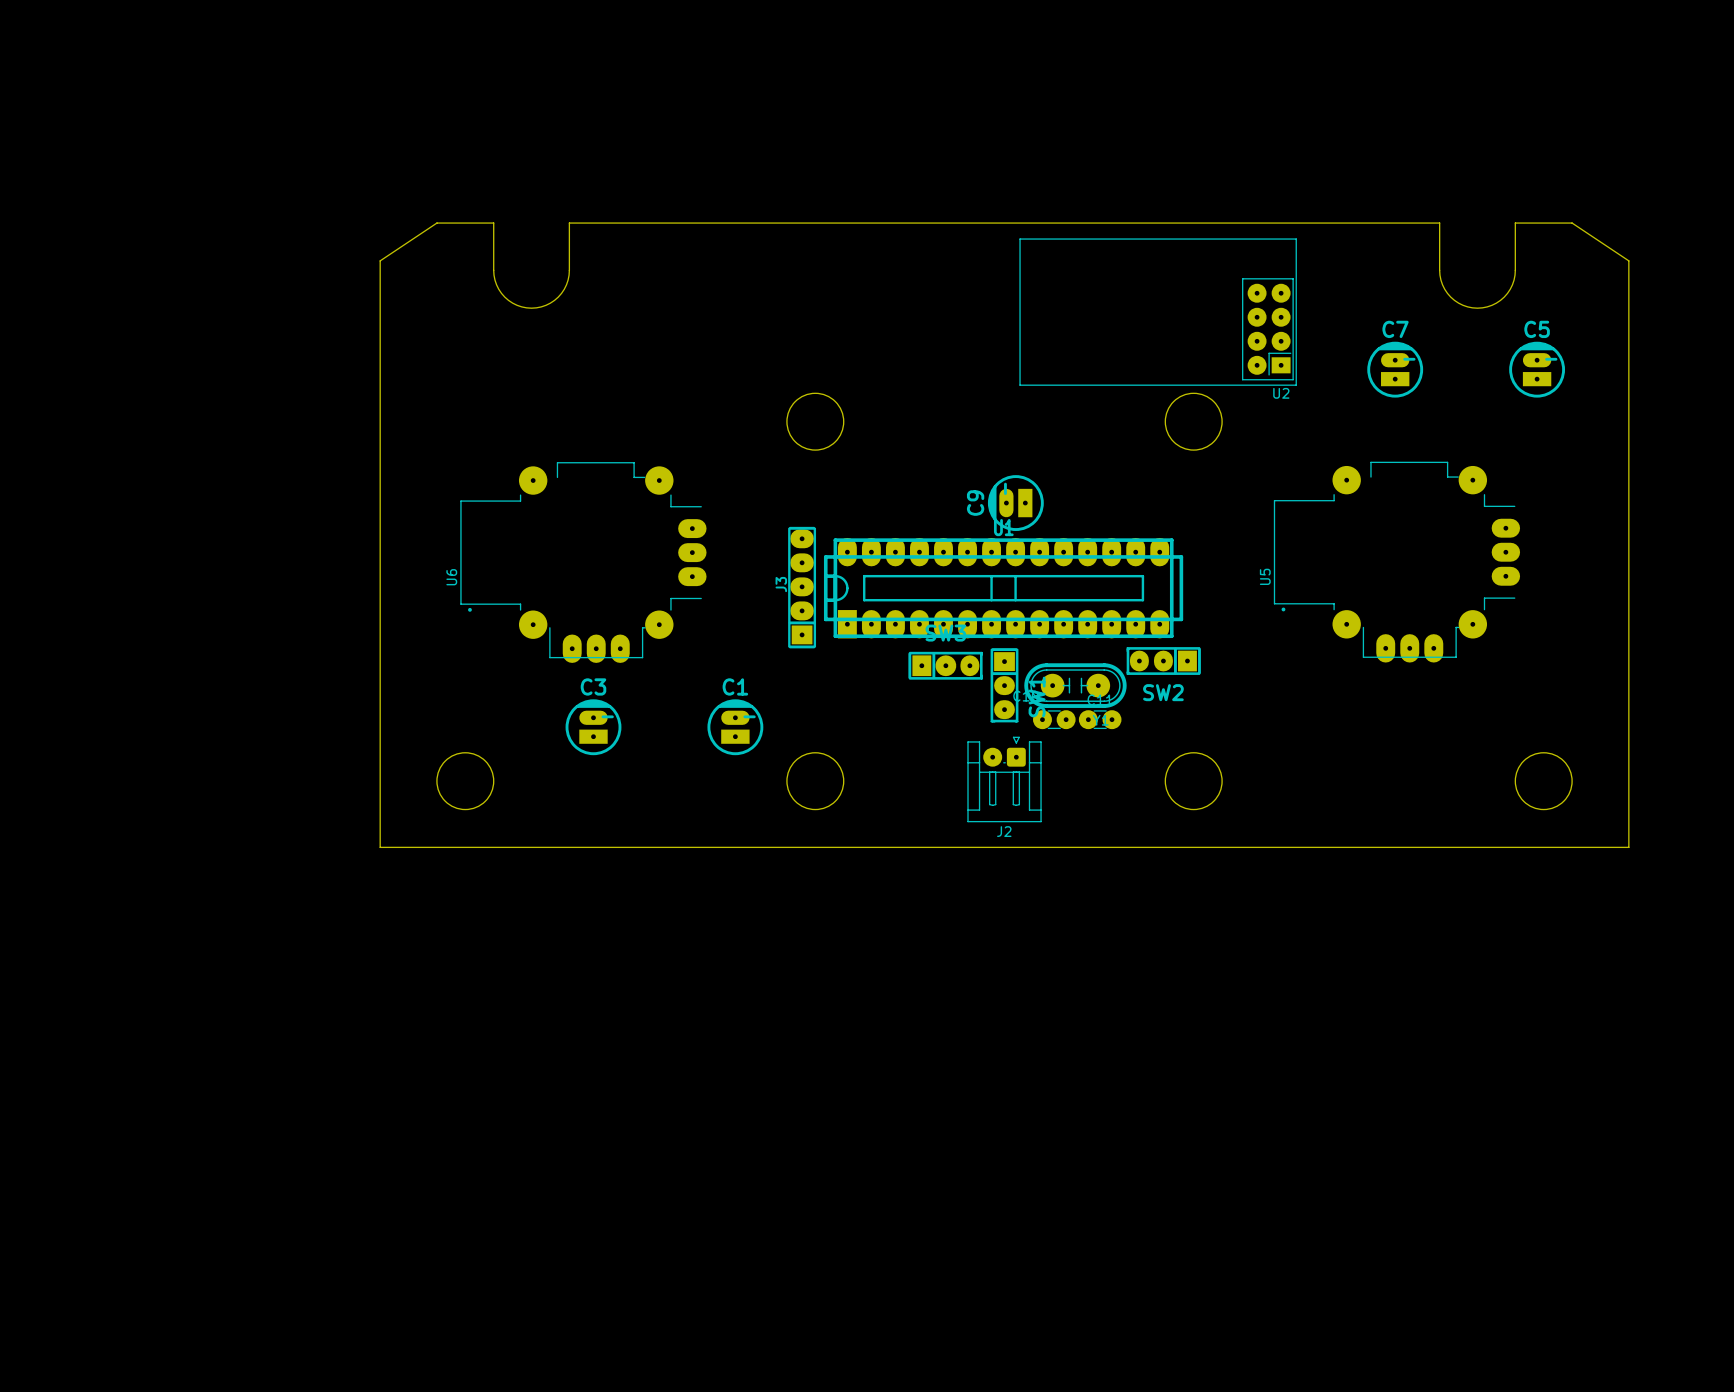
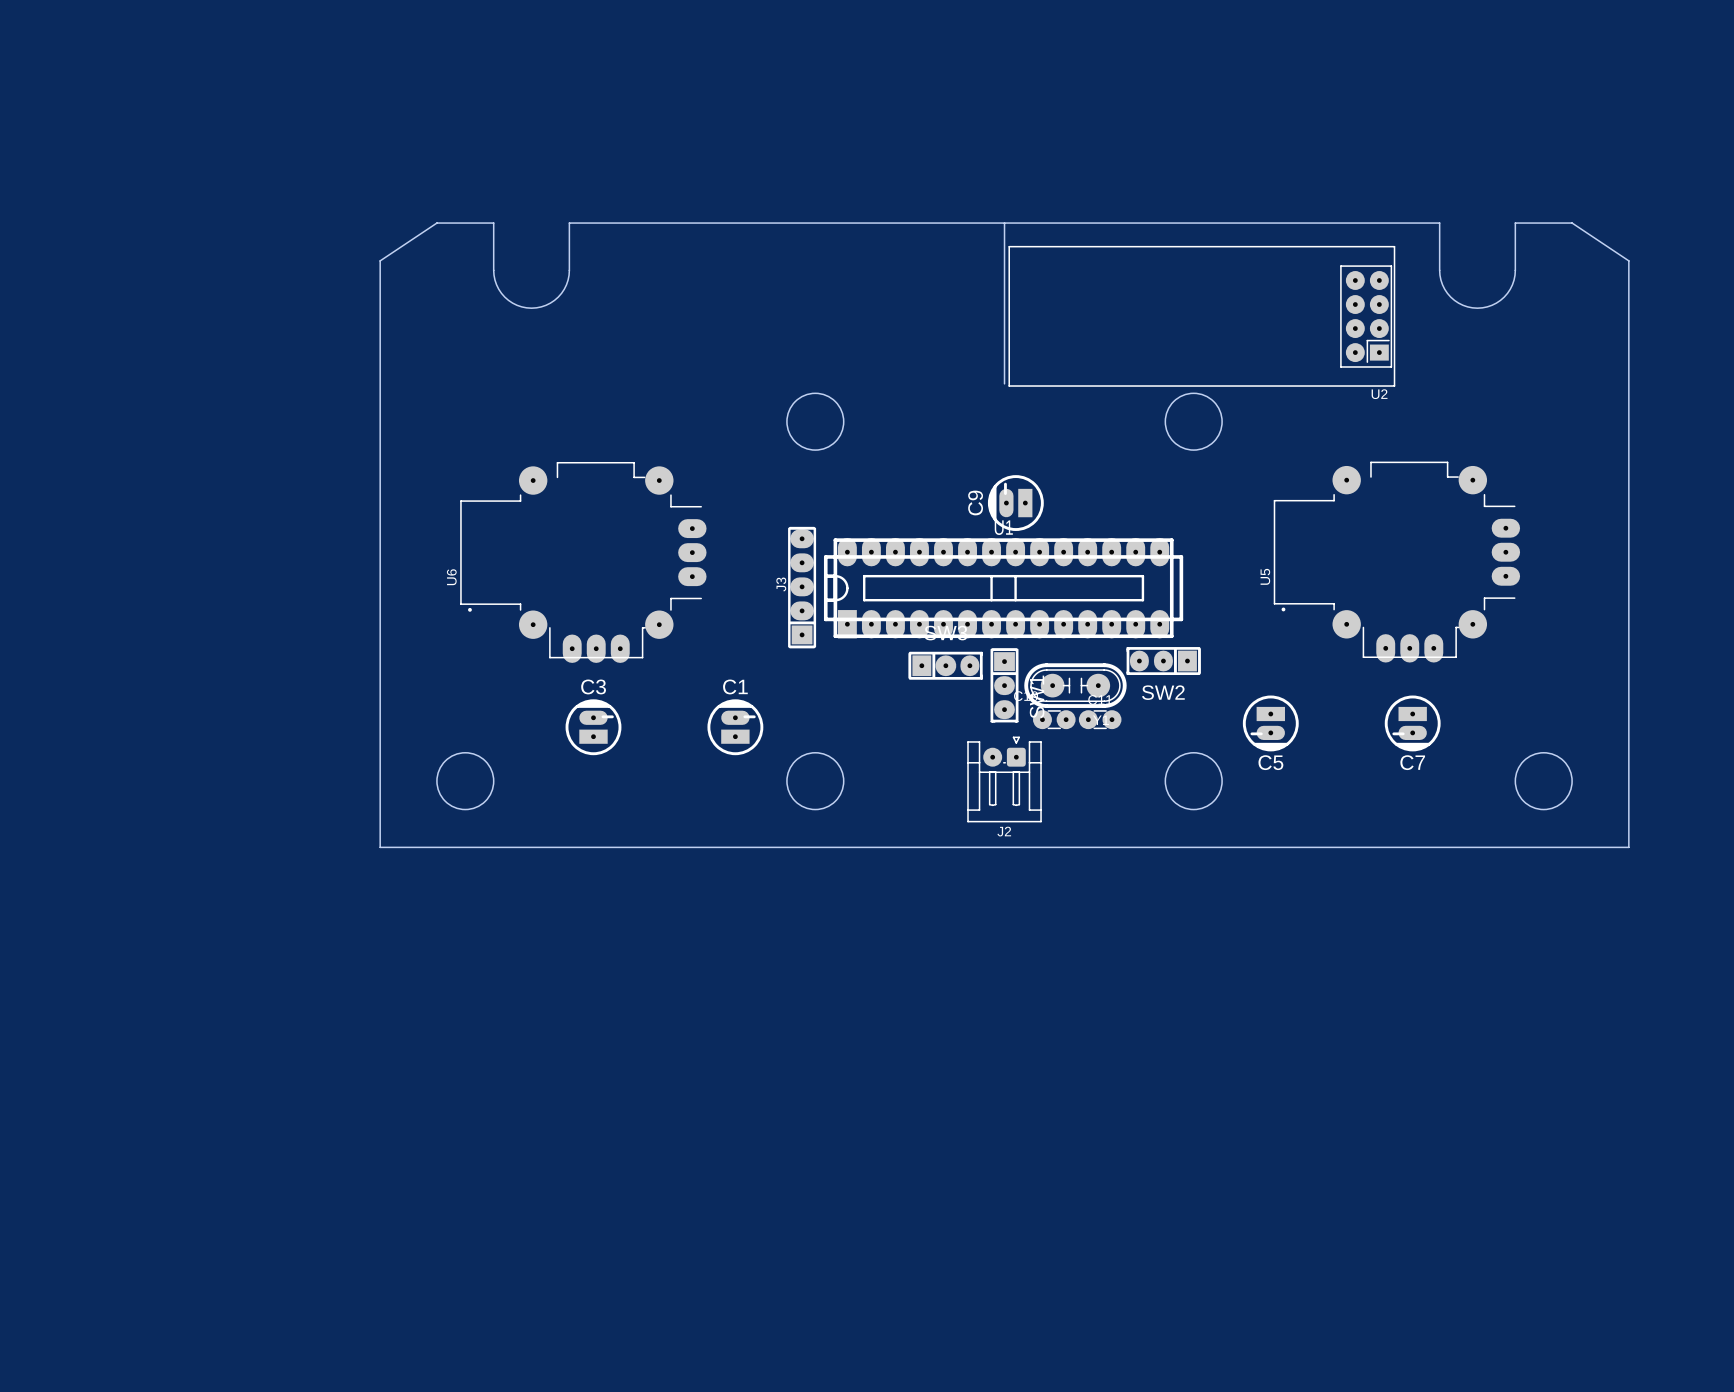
board edge: none -> (1004, 223) (1004, 383)
U2 footprint: [1019, 238, 1297, 386] -> [1008, 246, 1396, 387]
C7 rotation: 0° (1395, 369) -> 180° (1412, 723)
C7 position: (1395, 369) -> (1412, 723)
C5 rotation: 0° (1537, 369) -> 180° (1270, 723)
C5 position: (1537, 369) -> (1270, 723)
U2 name position: U2 (1281, 393) -> U2 (1379, 394)

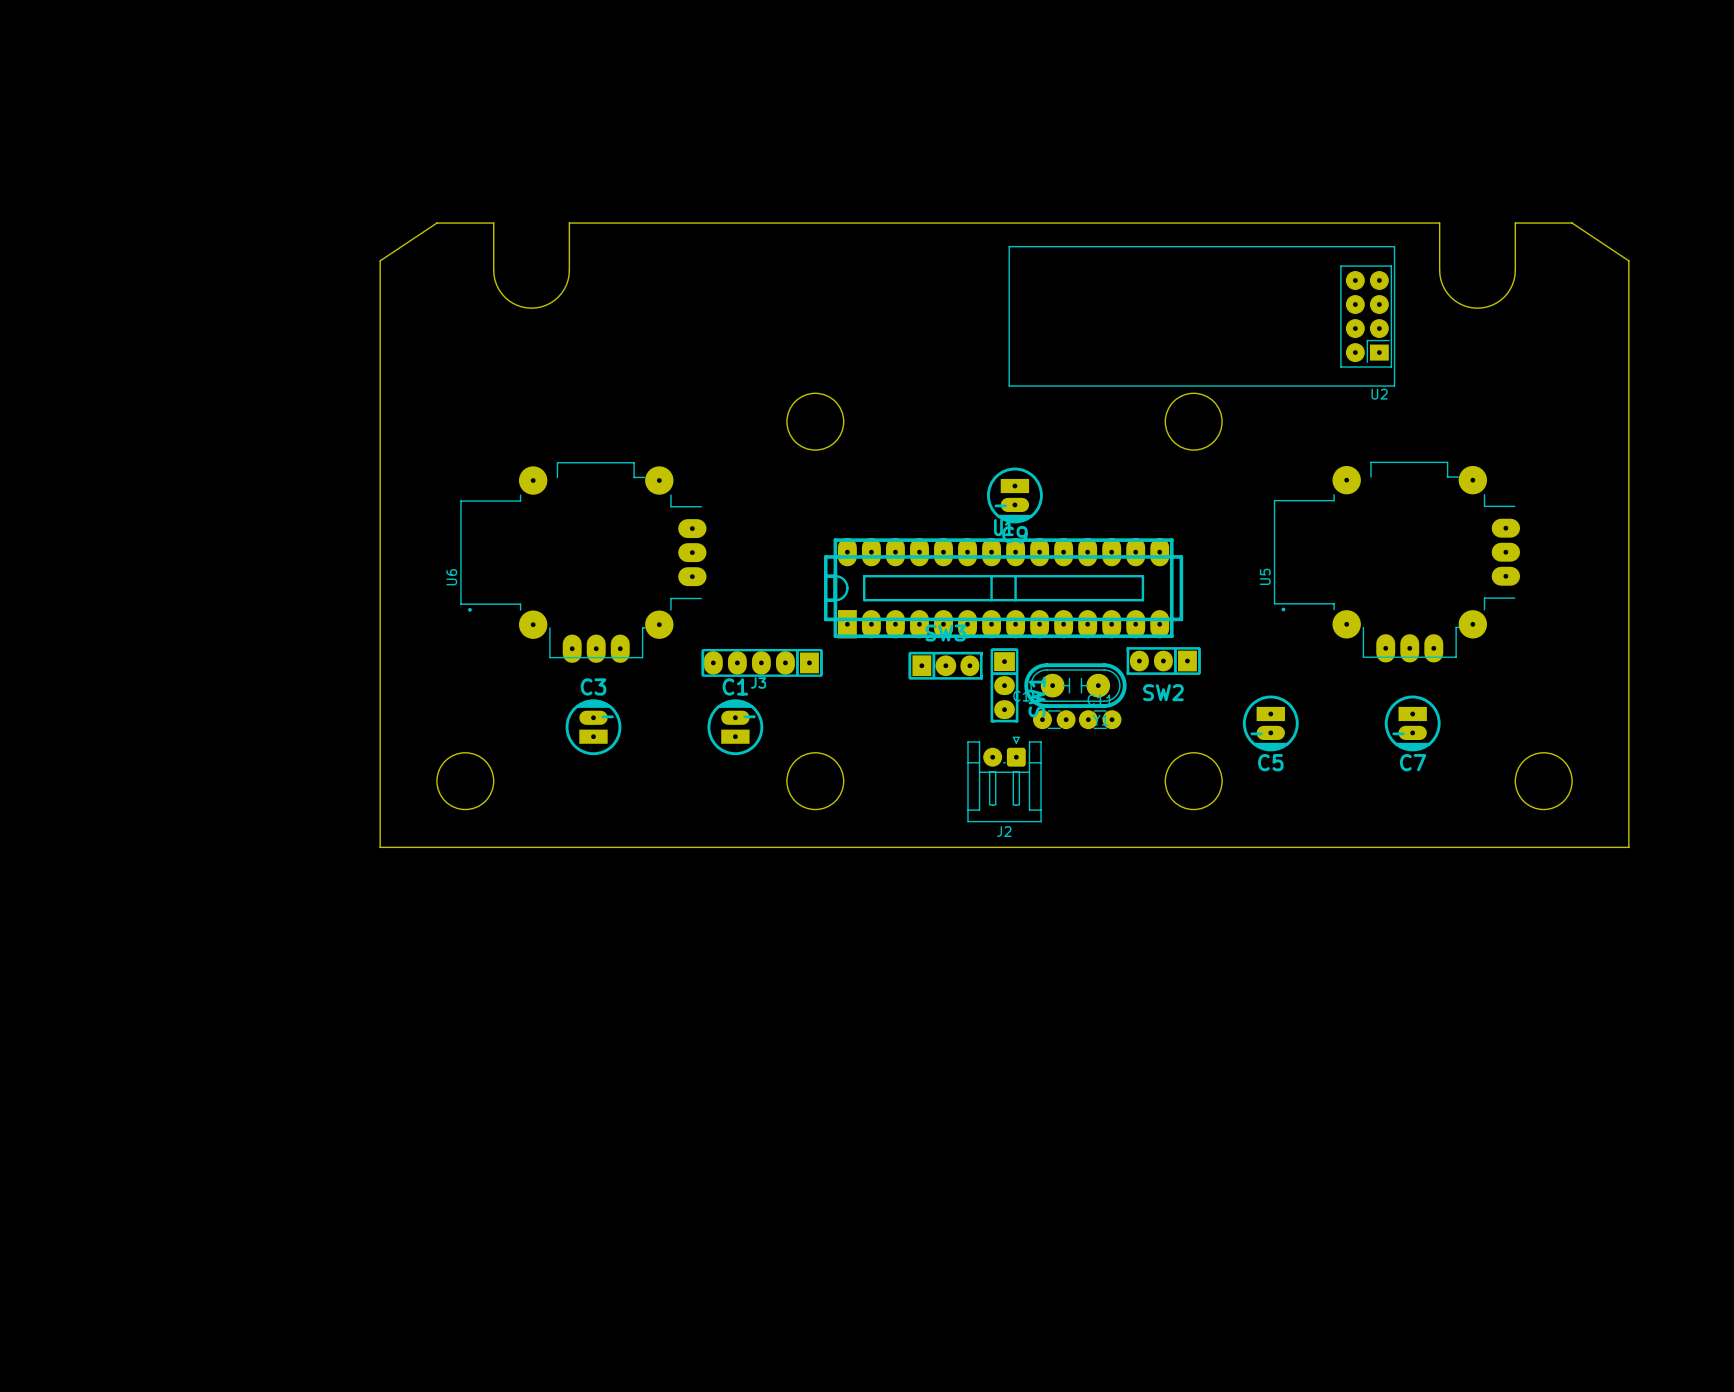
board edge: (1004, 223) (1004, 383) -> none
C9 rotation: 0° (1015, 503) -> 90° counterclockwise (1014, 495)
J3 rotation: 0° (802, 587) -> 90° counterclockwise (762, 662)
J3 position: (802, 587) -> (762, 662)

